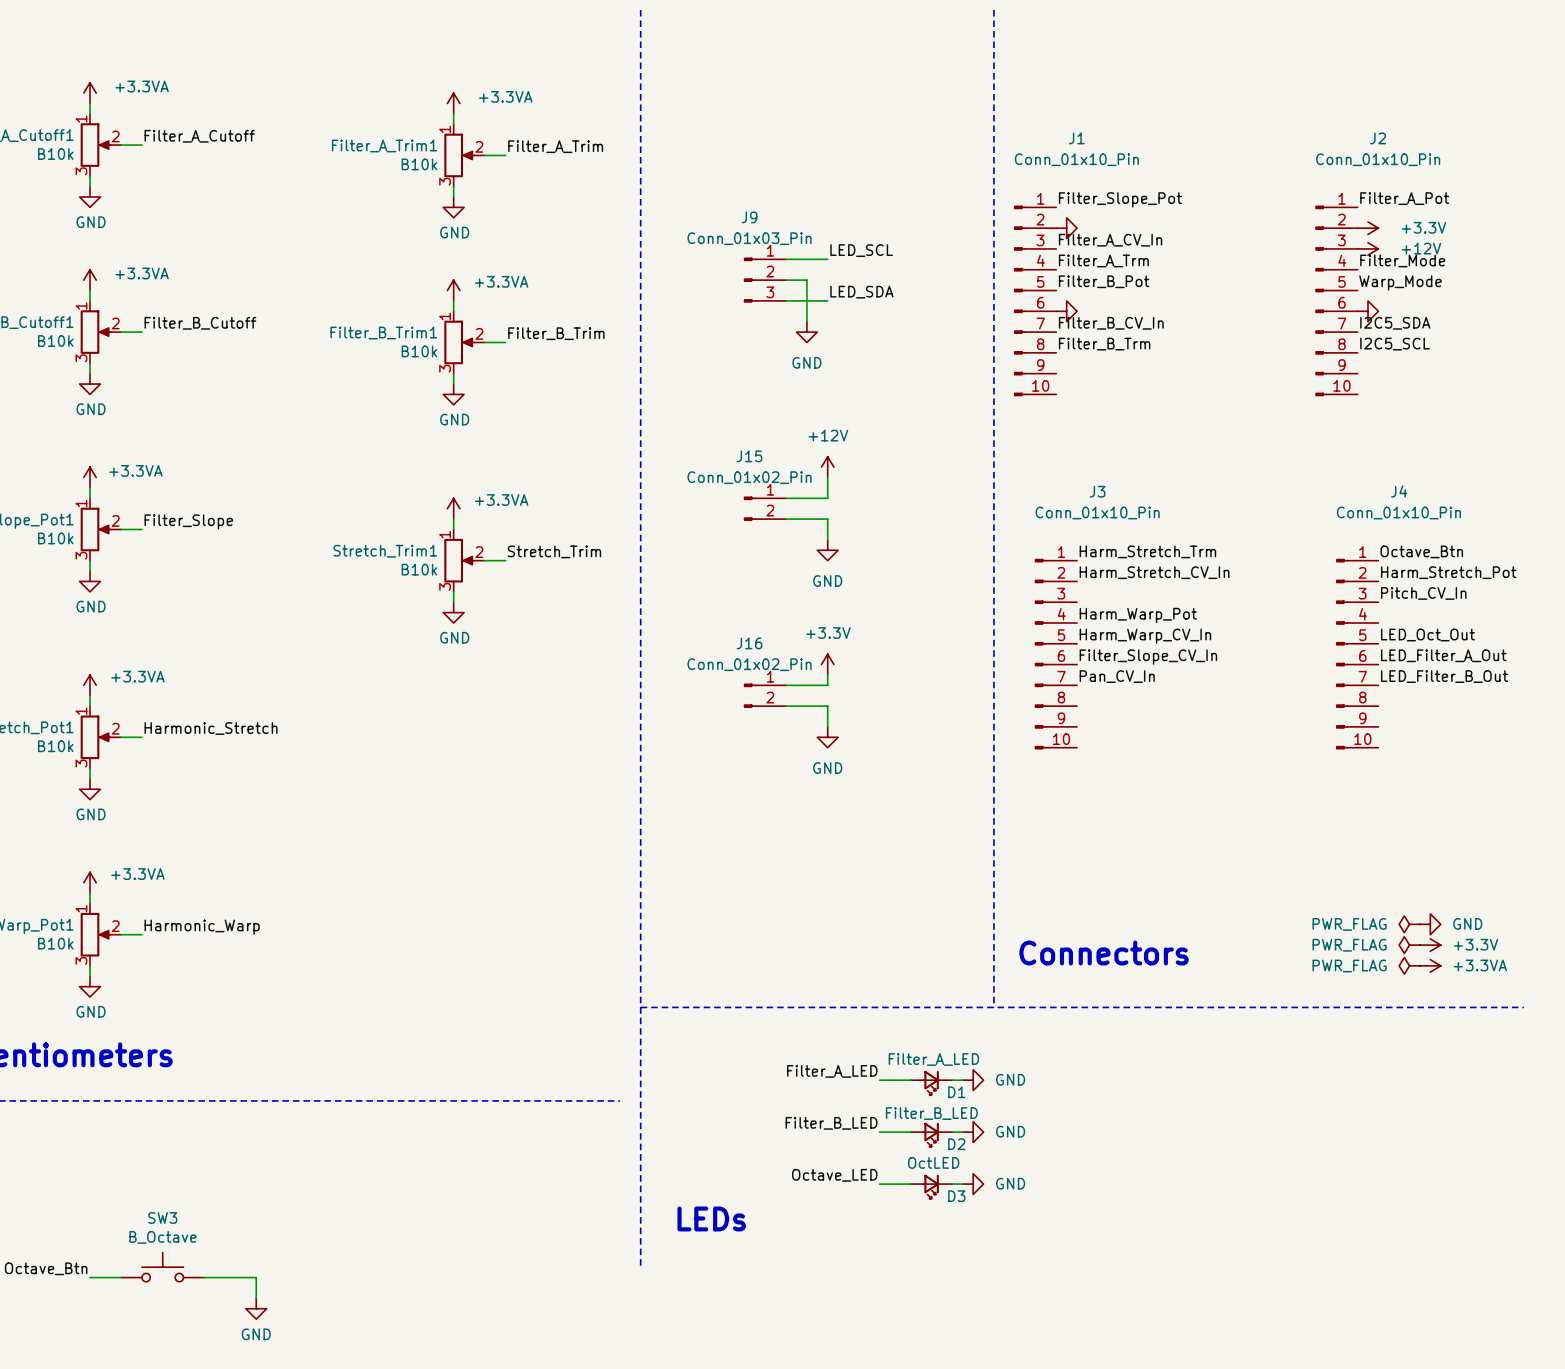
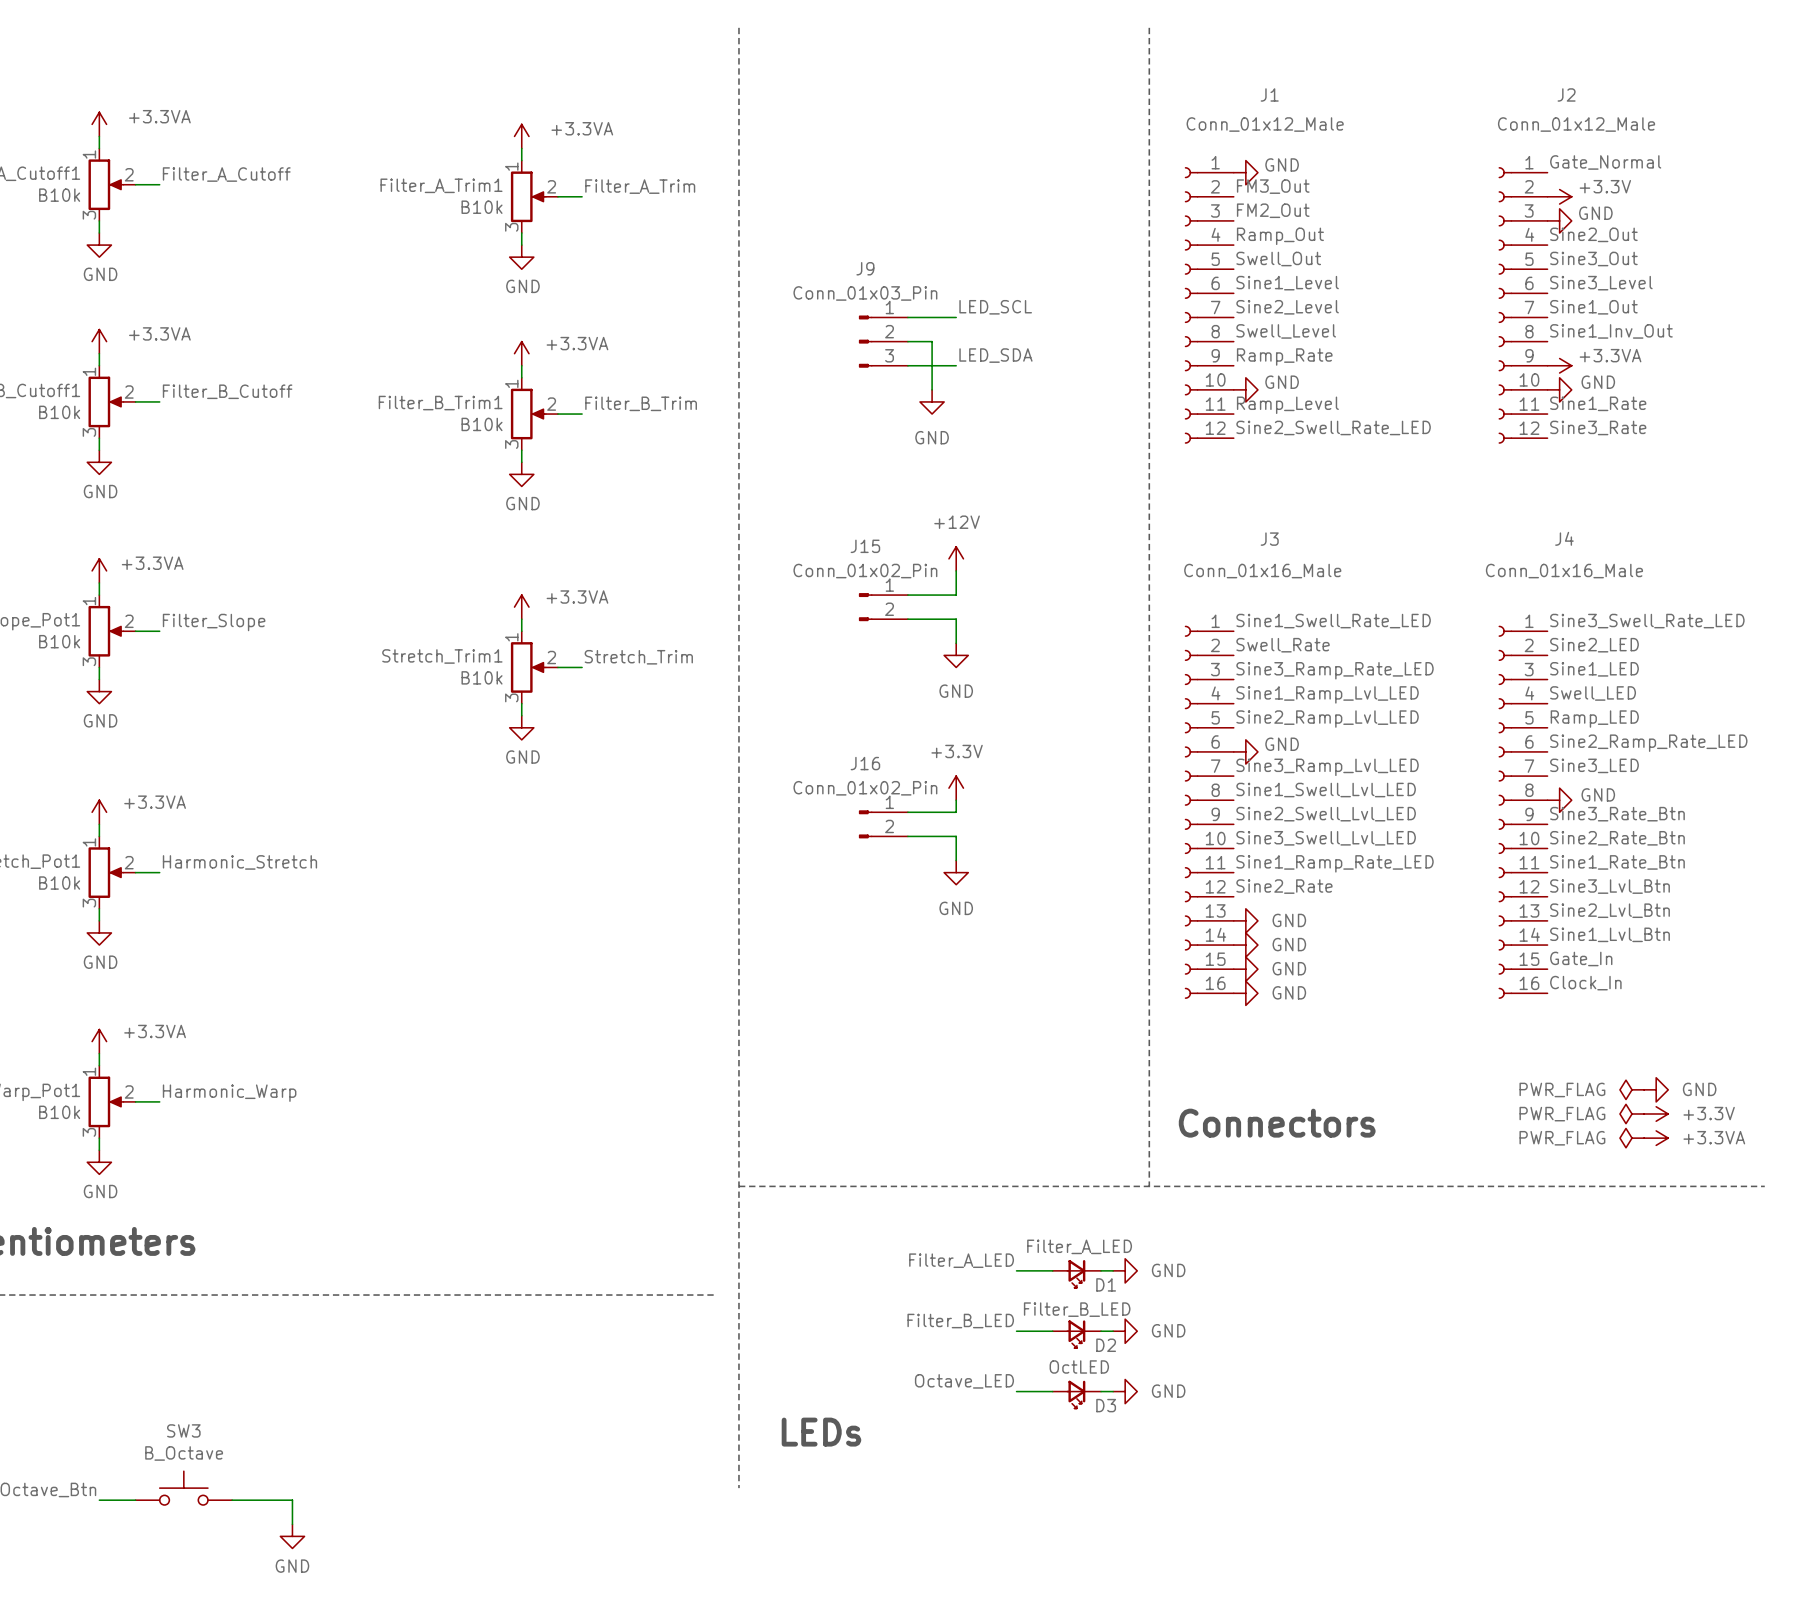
label: none -> Gate_Normal (1605, 162)
power symbol: none -> GND (1245, 172)
J1 name position: J1 (1076, 138) -> J1 (1269, 94)
J2 name position: J2 (1378, 138) -> J2 (1566, 94)
label: none -> FM3_Out (1273, 186)
J1 value: Conn_01x10_Pin (1076, 159) -> Conn_01x12_Male (1265, 124)
J2 value: Conn_01x10_Pin (1378, 159) -> Conn_01x12_Male (1576, 124)
label: none -> FM2_Out (1273, 210)
power symbol: none -> GND (1559, 220)
label: none -> Sine2_Out (1593, 234)
label: none -> Ramp_Out (1280, 236)
label: Filter_A_Pot (1404, 198) -> none
label: Filter_Slope_Pot (1120, 199) -> none
J1 symbol: [1014, 205, 1057, 397] -> [1184, 167, 1234, 444]
J2 symbol: [1315, 205, 1358, 397] -> [1498, 167, 1548, 444]
label: none -> Swell_Out (1278, 259)
label: none -> Sine3_Out (1593, 259)
power symbol text position: +3.3V (1423, 227) -> +3.3V (1605, 186)
power symbol: (1066, 228) -> none
power symbol position: +3.3V (1368, 228) -> +3.3V (1559, 196)
label: none -> Sine1_Level (1287, 283)
label: none -> Sine3_Level (1601, 283)
label: Filter_A_CV_In (1110, 240) -> none
power symbol: +12V (1368, 248) -> none
label: none -> Sine2_Level (1287, 307)
label: none -> Sine1_Out (1593, 307)
label: Filter_A_Trm (1103, 260) -> none
label: Filter_Mode (1402, 260) -> none
label: none -> Swell_Level (1286, 331)
label: none -> Sine1_Inv_Out (1611, 331)
label: Filter_B_Pot (1104, 281) -> none
label: Warp_Mode (1400, 282) -> none
label: none -> Ramp_Rate (1284, 357)
power symbol: none -> +3.3VA (1559, 365)
power symbol: (1066, 311) -> none
power symbol: (1368, 311) -> none
power symbol: none -> GND (1245, 389)
power symbol: none -> GND (1559, 389)
label: Filter_B_CV_In (1111, 323) -> none
label: I2C5_SDA (1395, 323) -> none
label: none -> Sine1_Rate (1598, 403)
label: none -> Ramp_Level (1287, 405)
label: Filter_B_Trm (1104, 344) -> none
label: I2C5_SCL (1395, 344) -> none
label: none -> Sine2_Swell_Rate_LED (1333, 427)
label: none -> Sine3_Rate (1598, 427)
J3 name position: J3 (1097, 491) -> J3 (1269, 539)
J4 name position: J4 (1399, 491) -> J4 (1564, 538)
J3 value: Conn_01x10_Pin (1097, 512) -> Conn_01x16_Male (1262, 571)
J4 value: Conn_01x10_Pin (1398, 512) -> Conn_01x16_Male (1564, 571)
label: none -> Sine1_Swell_Rate_LED (1333, 621)
label: none -> Sine3_Swell_Rate_LED (1647, 621)
label: none -> Swell_Rate (1283, 645)
label: none -> Sine2_LED (1594, 645)
label: Harm_Stretch_Trm (1147, 551) -> none
label: Octave_Btn (1421, 551) -> none
J3 symbol: [1034, 559, 1078, 750] -> [1184, 625, 1234, 999]
J4 symbol: [1336, 559, 1379, 750] -> [1498, 625, 1548, 999]
label: none -> Sine1_LED (1594, 669)
label: none -> Sine3_Ramp_Rate_LED (1335, 670)
label: Harm_Stretch_CV_In (1154, 572) -> none
label: Harm_Stretch_Pot (1448, 572) -> none
label: none -> Swell_LED (1593, 693)
label: none -> Sine1_Ramp_Lvl_LED (1327, 694)
label: Pitch_CV_In (1423, 593) -> none
label: none -> Sine2_Ramp_Lvl_LED (1327, 719)
label: none -> Ramp_LED (1594, 719)
label: Harm_Warp_Pot (1138, 615) -> none
label: none -> Sine2_Ramp_Rate_LED (1648, 743)
power symbol: none -> GND (1245, 751)
label: LED_Oct_Out (1427, 635) -> none
label: Harm_Warp_CV_In (1145, 636) -> none
label: none -> Sine3_LED (1594, 765)
label: none -> Sine3_Ramp_Lvl_LED (1327, 767)
label: LED_Filter_A_Out (1443, 655) -> none
label: Filter_Slope_CV_In (1148, 657) -> none
label: none -> Sine1_Swell_Lvl_LED (1326, 790)
power symbol: none -> GND (1559, 800)
label: Pan_CV_In (1117, 676) -> none
label: LED_Filter_B_Out (1444, 676) -> none
label: none -> Sine2_Swell_Lvl_LED (1326, 814)
label: none -> Sine3_Rate_Btn (1617, 814)
label: none -> Sine3_Swell_Lvl_LED (1326, 838)
label: none -> Sine2_Rate_Btn (1617, 838)
label: none -> Sine1_Rate_Btn (1617, 862)
label: none -> Sine1_Ramp_Rate_LED (1335, 863)
label: none -> Sine2_Rate (1284, 886)
label: none -> Sine3_Lvl_Btn (1610, 886)
label: none -> Sine2_Lvl_Btn (1610, 910)
power symbol: none -> GND (1245, 920)
label: none -> Sine1_Lvl_Btn (1610, 934)
power symbol: none -> GND (1245, 945)
label: none -> Gate_In (1581, 958)
power symbol: none -> GND (1245, 969)
label: none -> Clock_In (1585, 983)
power symbol: none -> GND (1245, 993)

